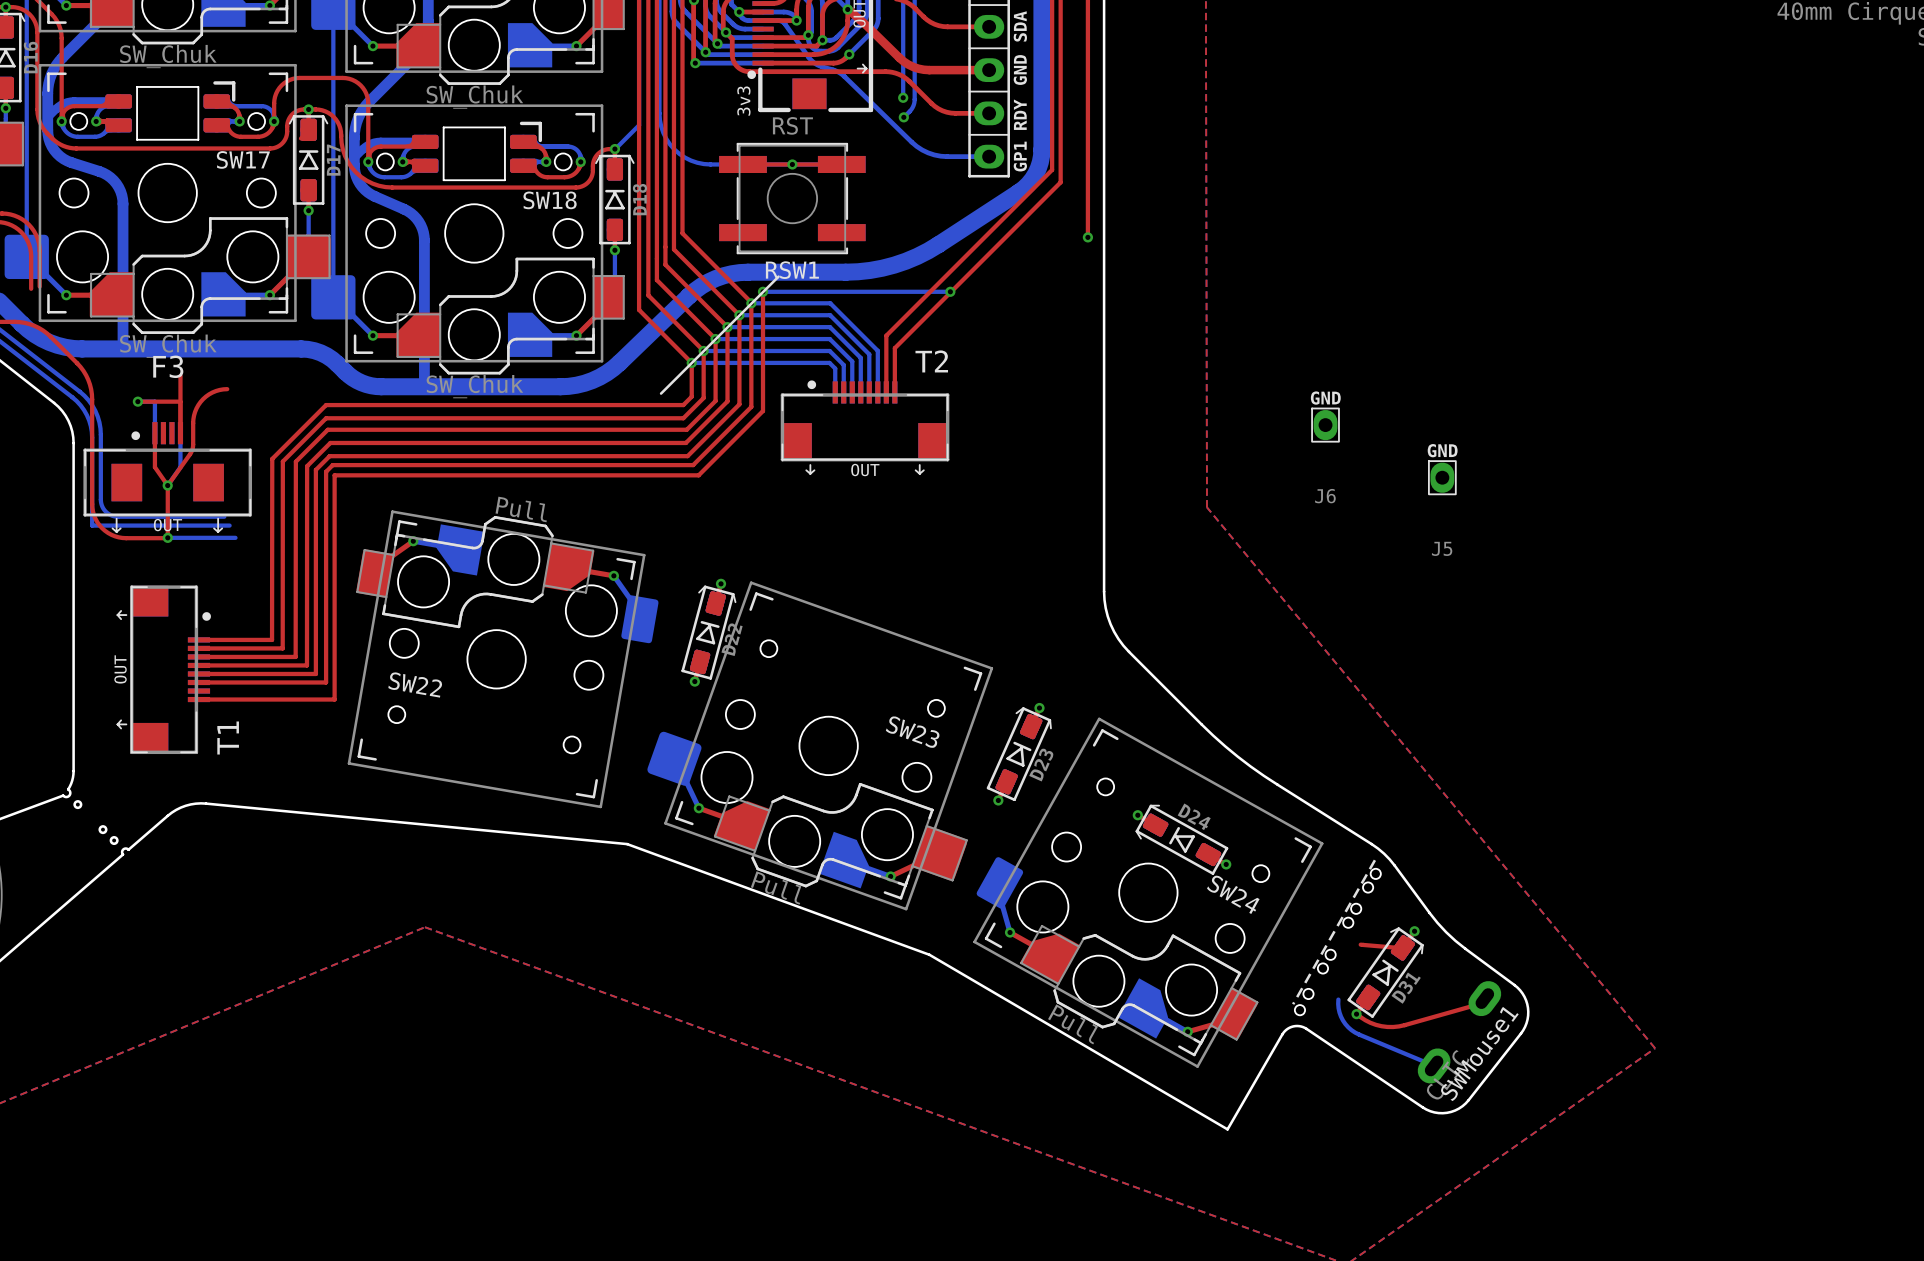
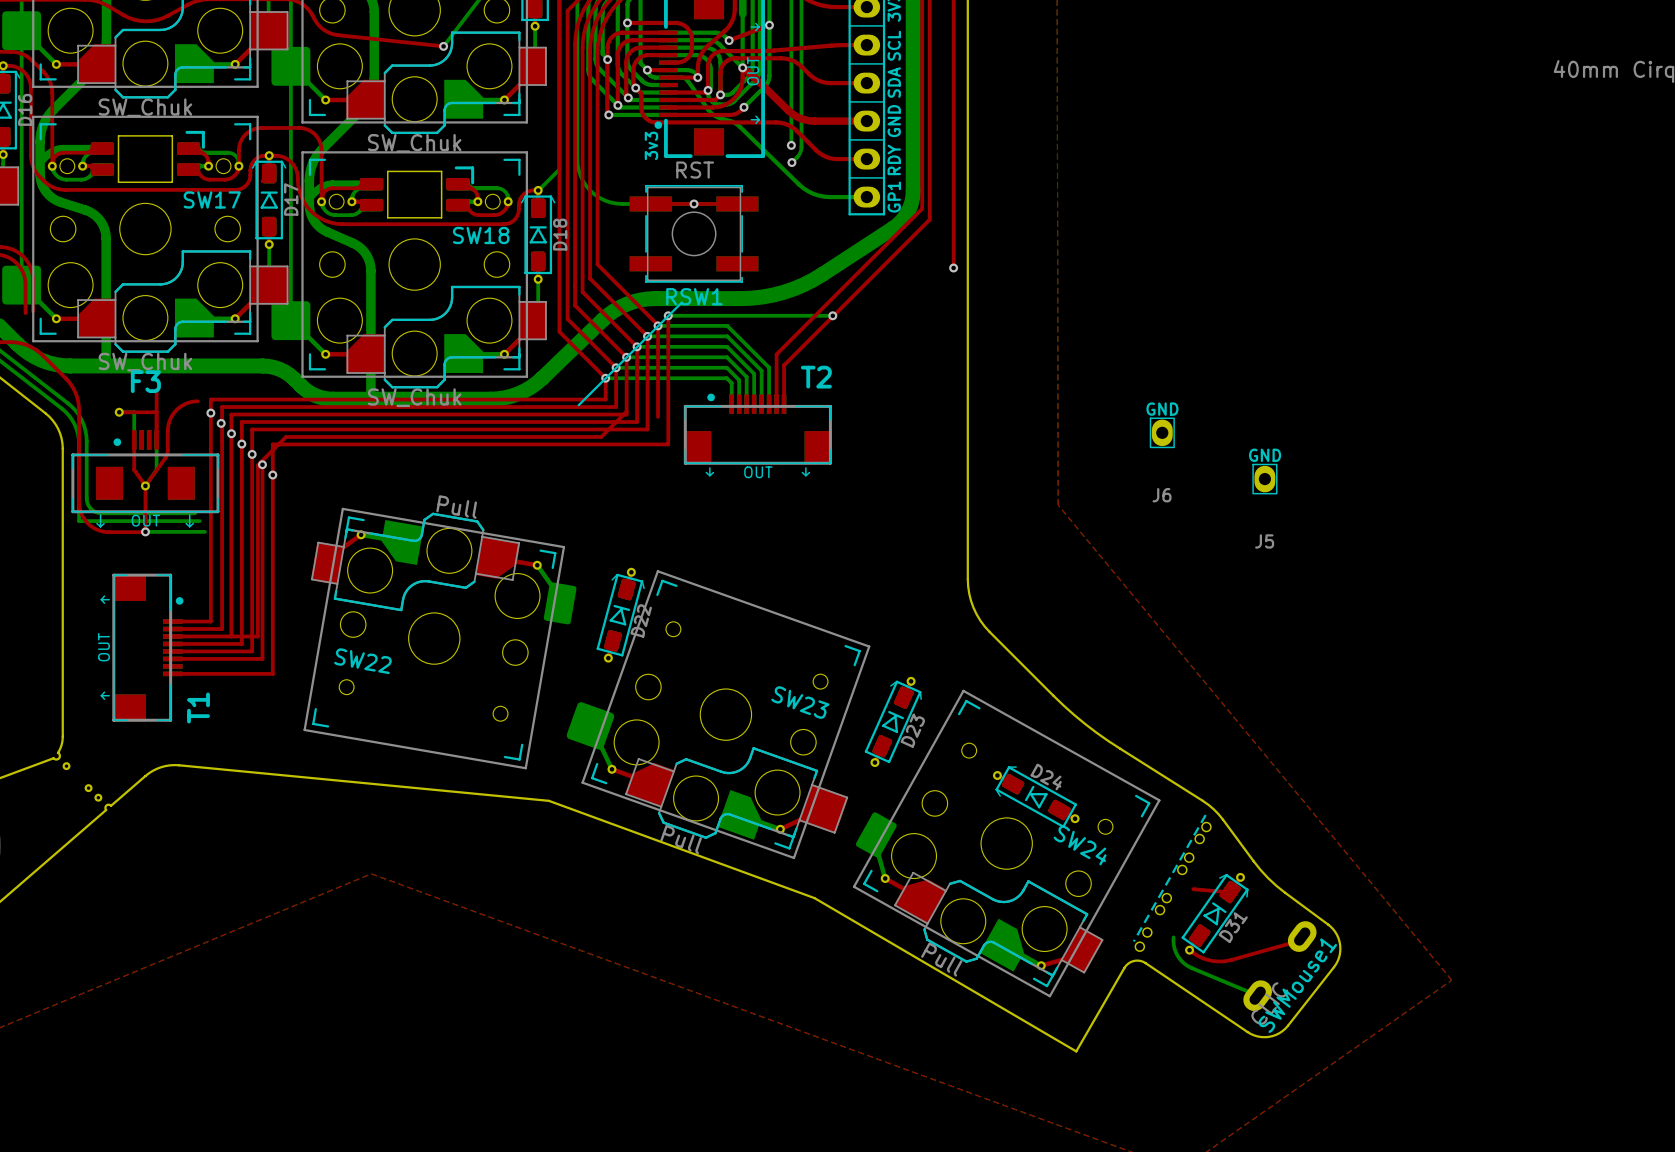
top track: (691, 387) (691, 396) (683, 405) (326, 405) (272, 458) (272, 639) (242, 639) -> (605, 399) (210, 399) (210, 621)
top track: (703, 395) (703, 397) (683, 418) (326, 418) (282, 461) (282, 648) (255, 648) -> (616, 407) (222, 407) (222, 629)
top track: none -> (626, 411) (626, 414) (231, 414) (231, 636)
top track: (727, 401) (685, 442) (330, 442) (307, 466) (306, 665) (277, 665) -> (637, 412) (637, 422) (241, 422) (241, 643)
via: none -> (210, 413)
top track: (739, 404) (687, 456) (329, 456) (315, 469) (315, 673) (289, 673) -> (647, 414) (647, 429) (252, 429) (252, 651)
top track: (751, 406) (693, 465) (332, 465) (326, 471) (326, 682) -> none
top track: (763, 411) (698, 475) (334, 475) (334, 699) (312, 699) -> (668, 420) (668, 444) (272, 444) (272, 673)
via: none -> (221, 423)
via: none -> (231, 433)
via: none -> (241, 444)
via: none -> (252, 454)
via: none -> (262, 464)
via: none -> (272, 475)
top track: (300, 682) (325, 682) -> (262, 658) (262, 464)

